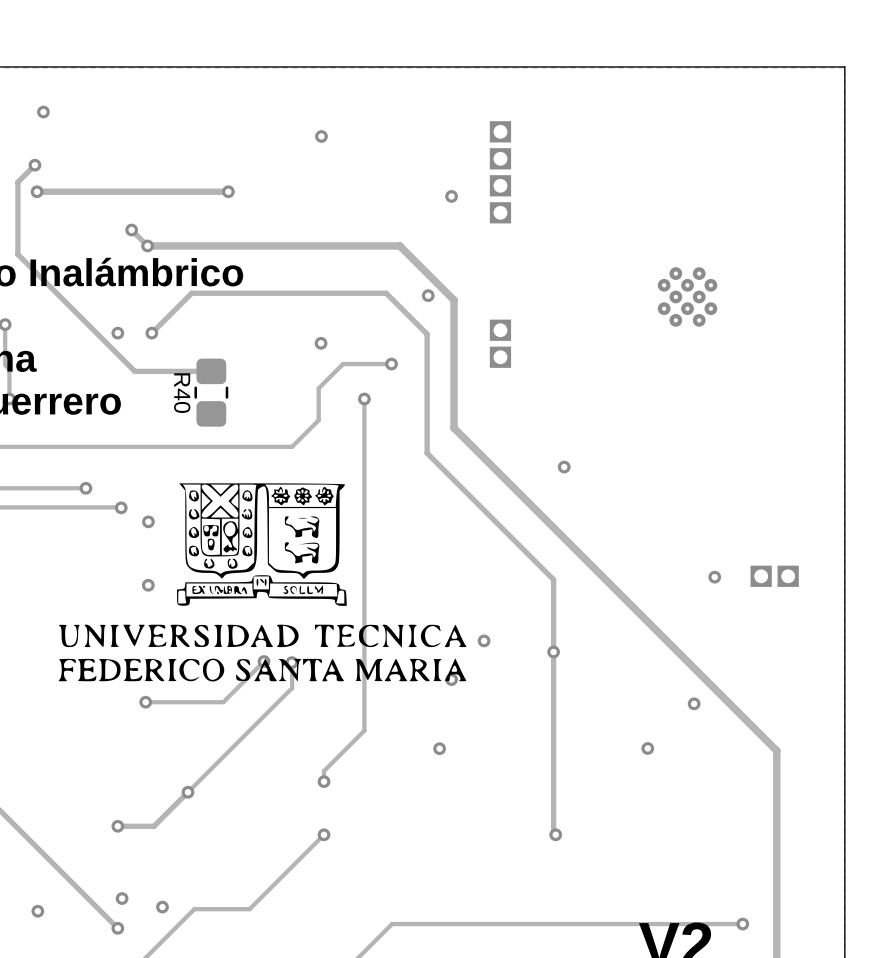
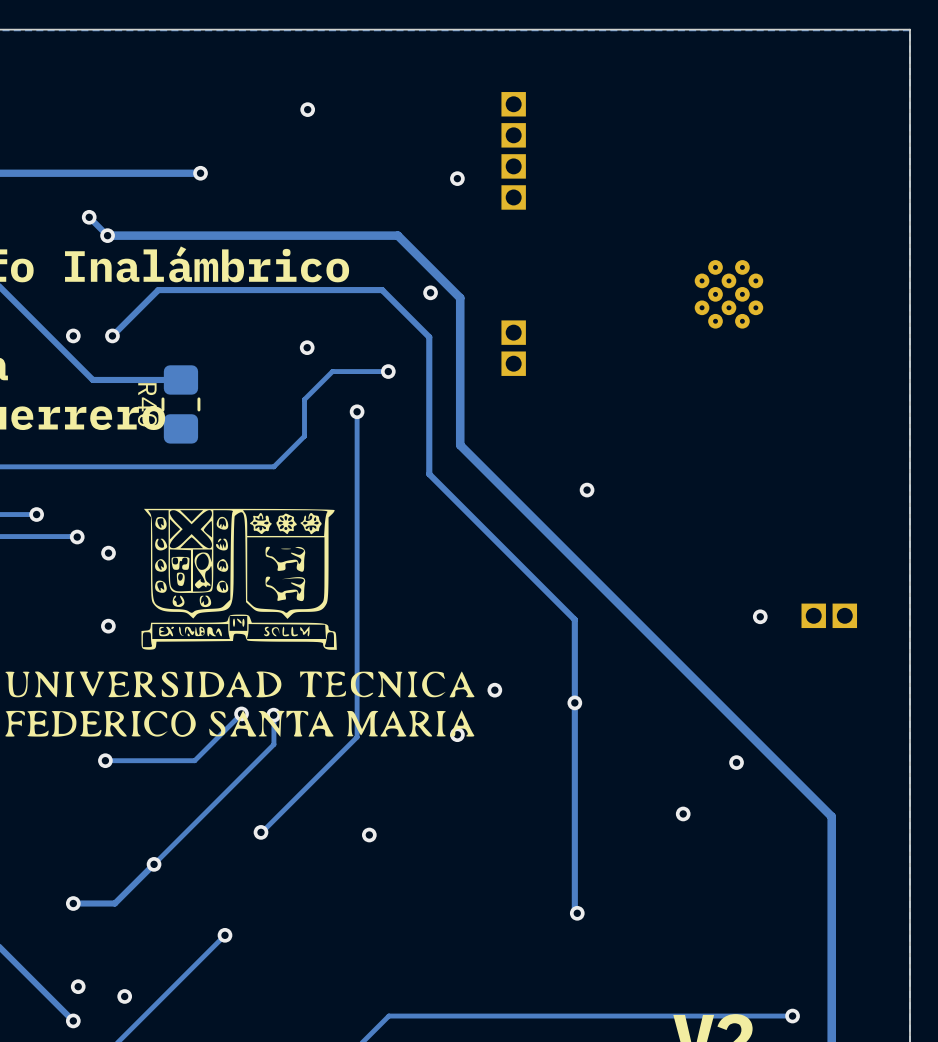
track: (364, 681) (364, 730) (324, 771) (324, 781) -> (357, 737) (261, 832)
via: (439, 748) -> none
via: none -> (261, 832)
via: none -> (369, 835)
via: (324, 781) -> none
track: (324, 834) (249, 909) (194, 909) -> (225, 935) (161, 998)
via: (324, 834) -> none
via: none -> (225, 935)

